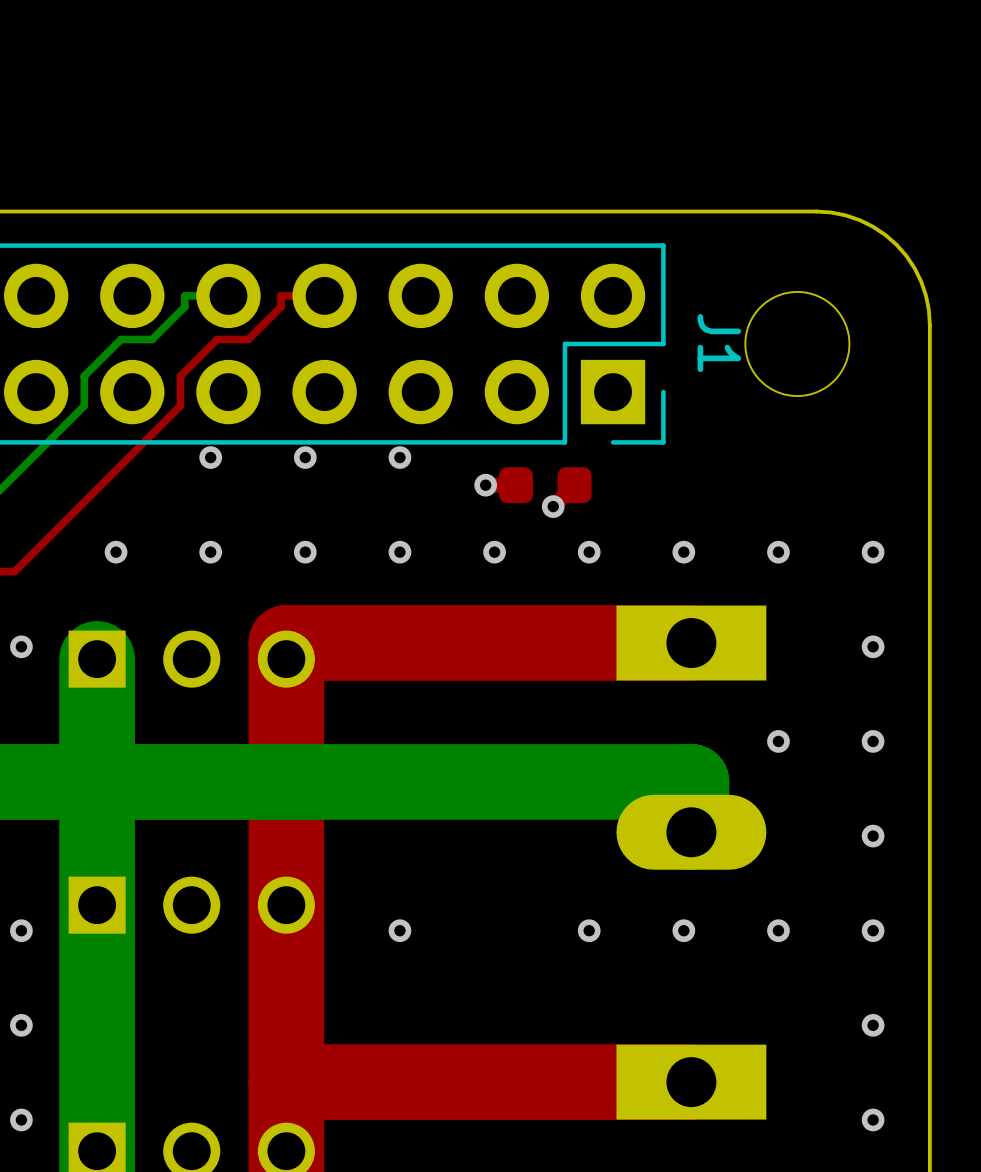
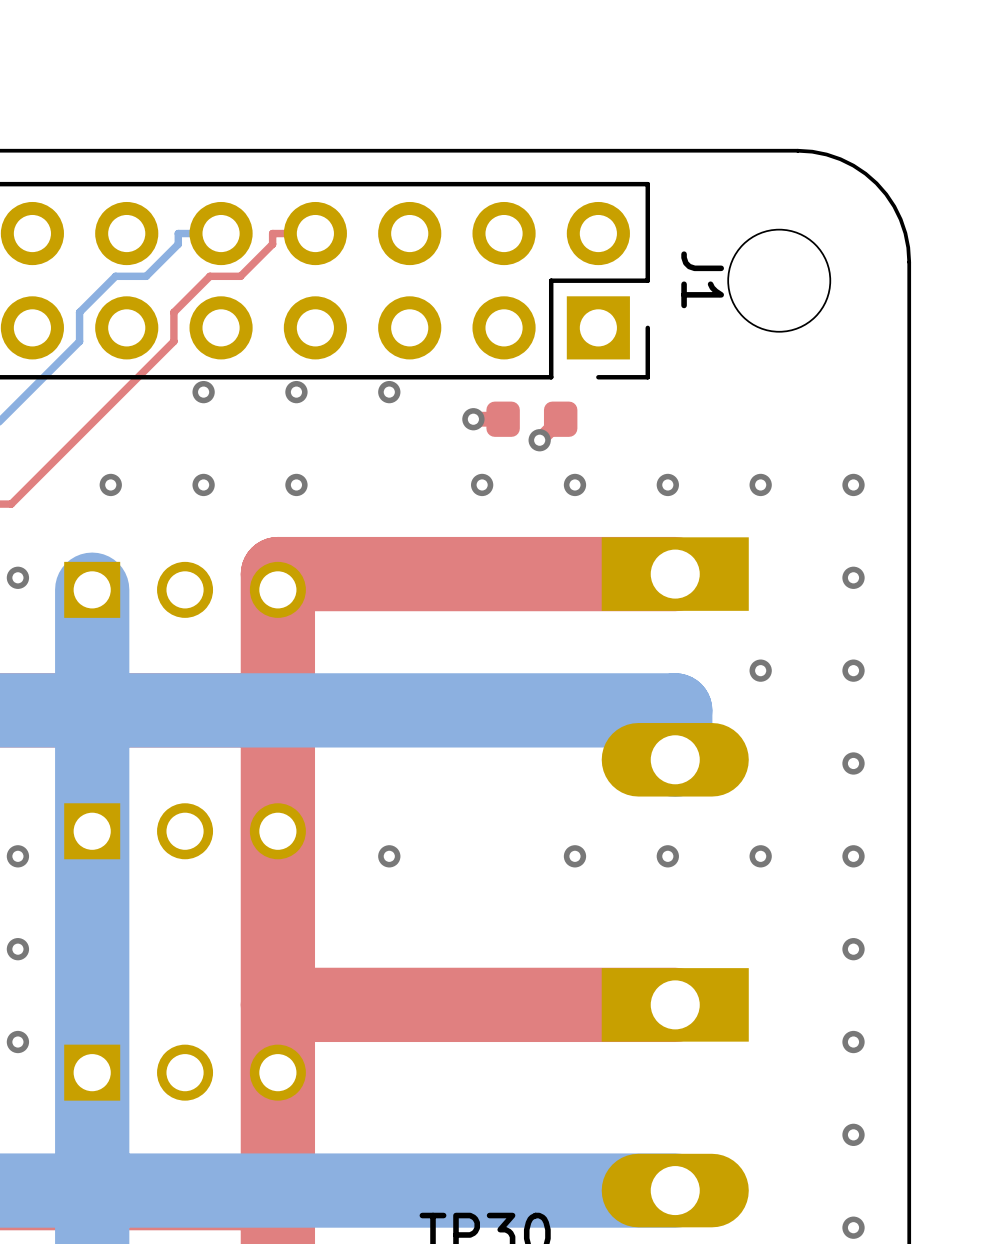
via: (399, 552) -> none

